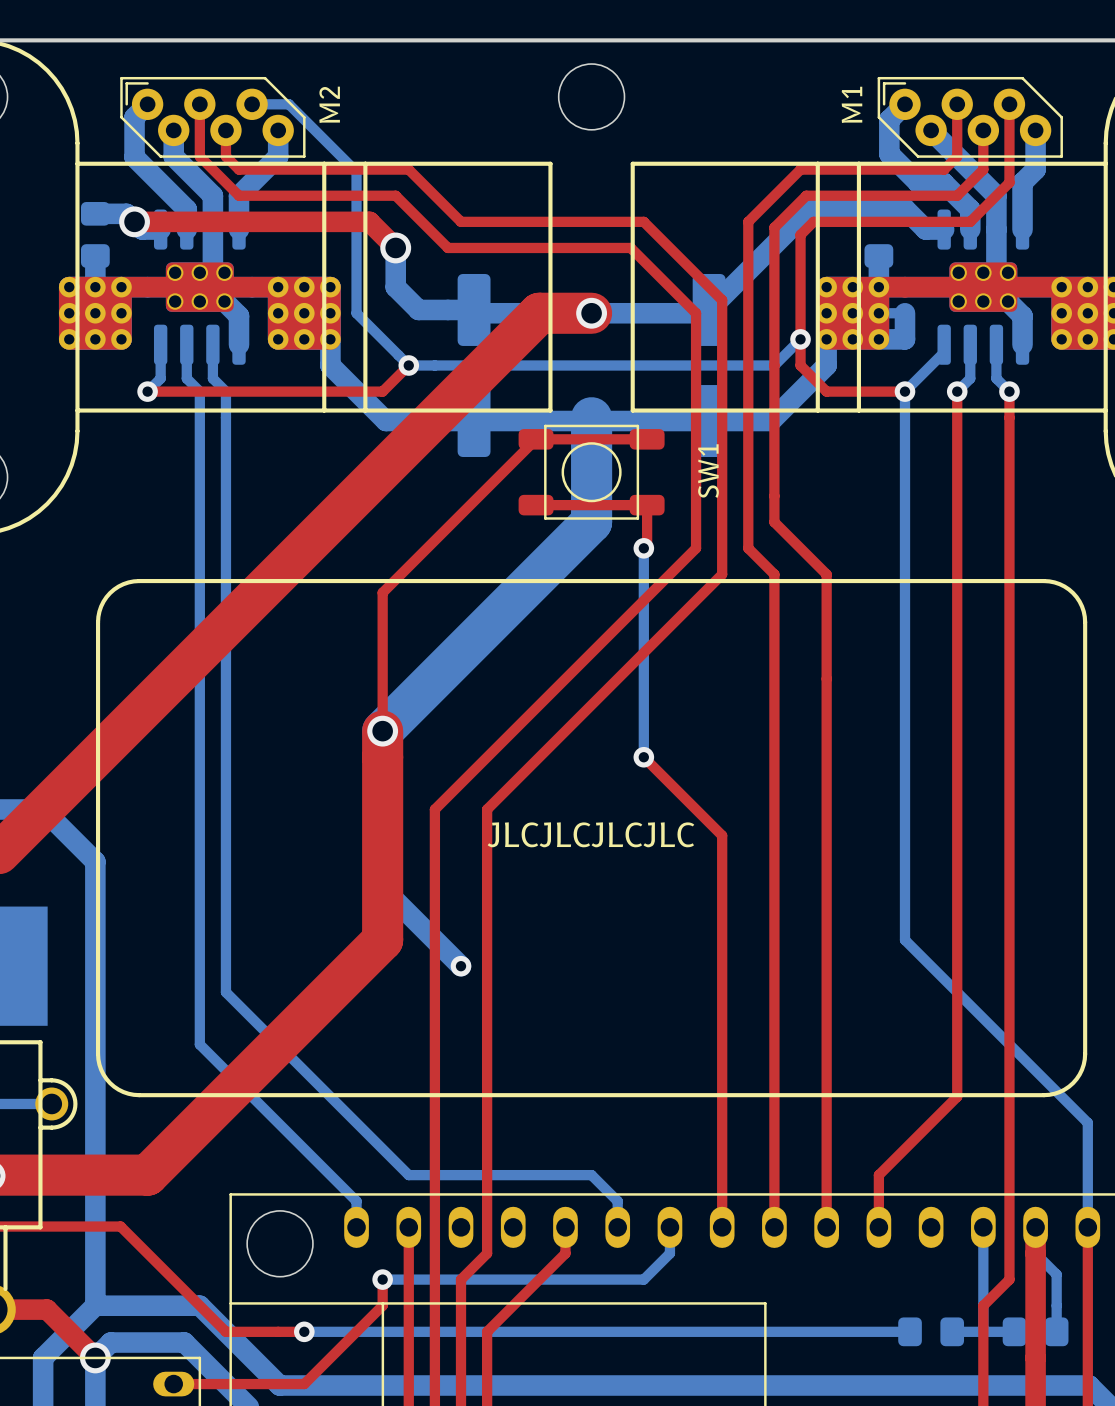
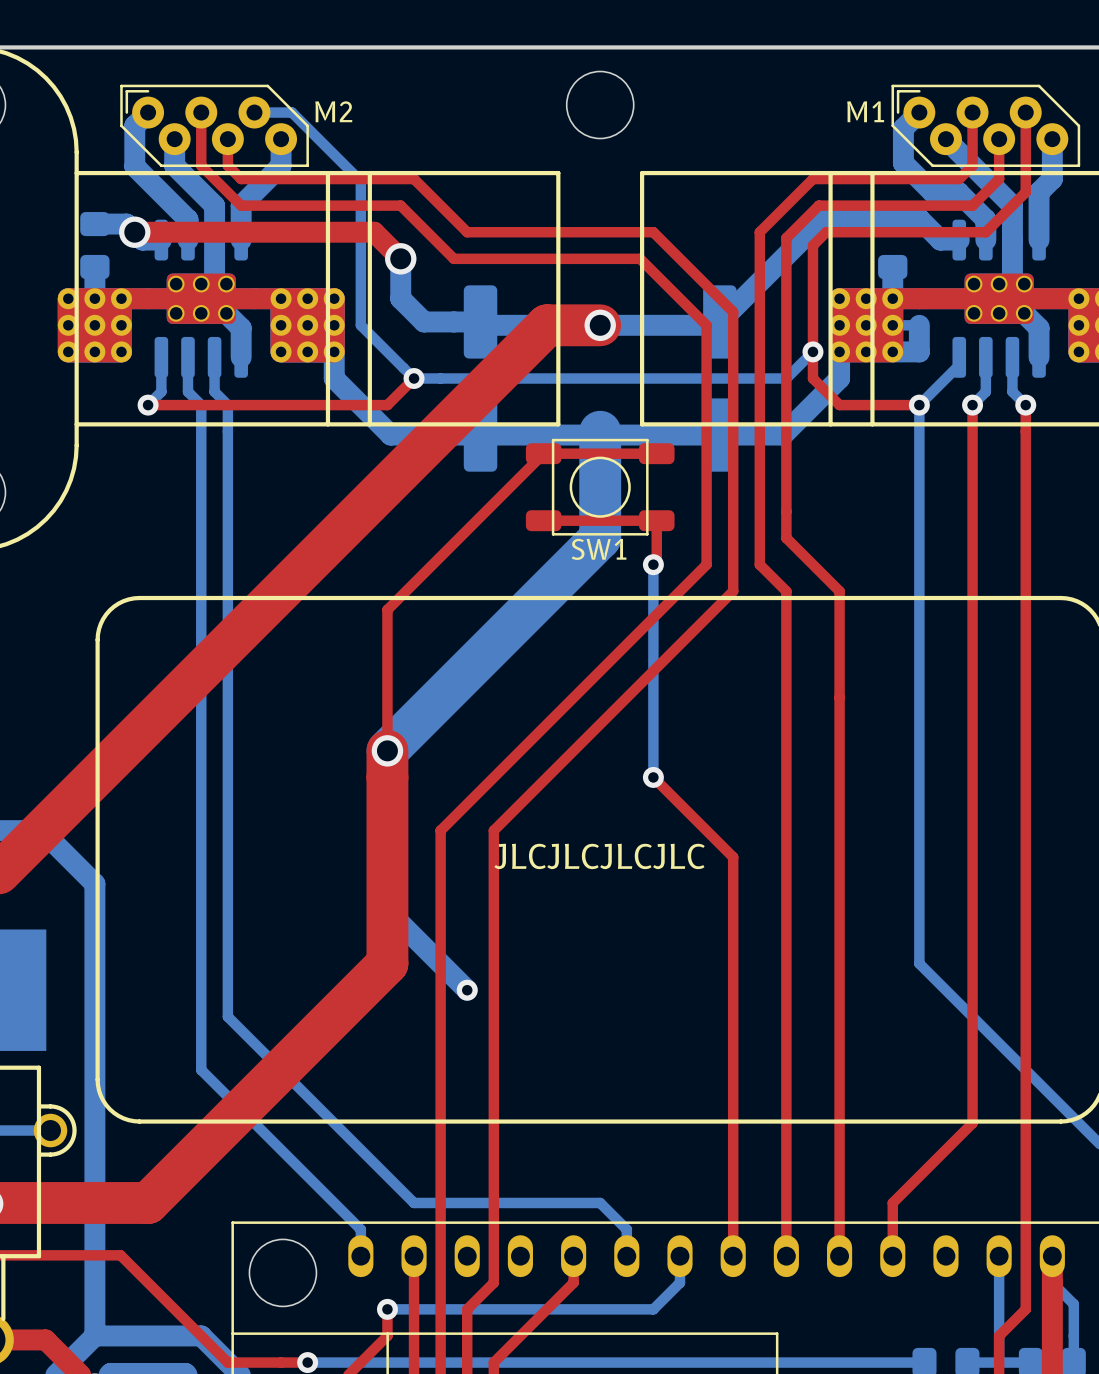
M2 name rotation: 0° (329, 104) -> 90° clockwise (333, 111)
M1 name rotation: 0° (851, 104) -> 90° clockwise (865, 111)
SW1 name rotation: 0° (708, 471) -> 90° clockwise (599, 549)
SW1 name position: SW1 (708, 471) -> SW1 (599, 549)

